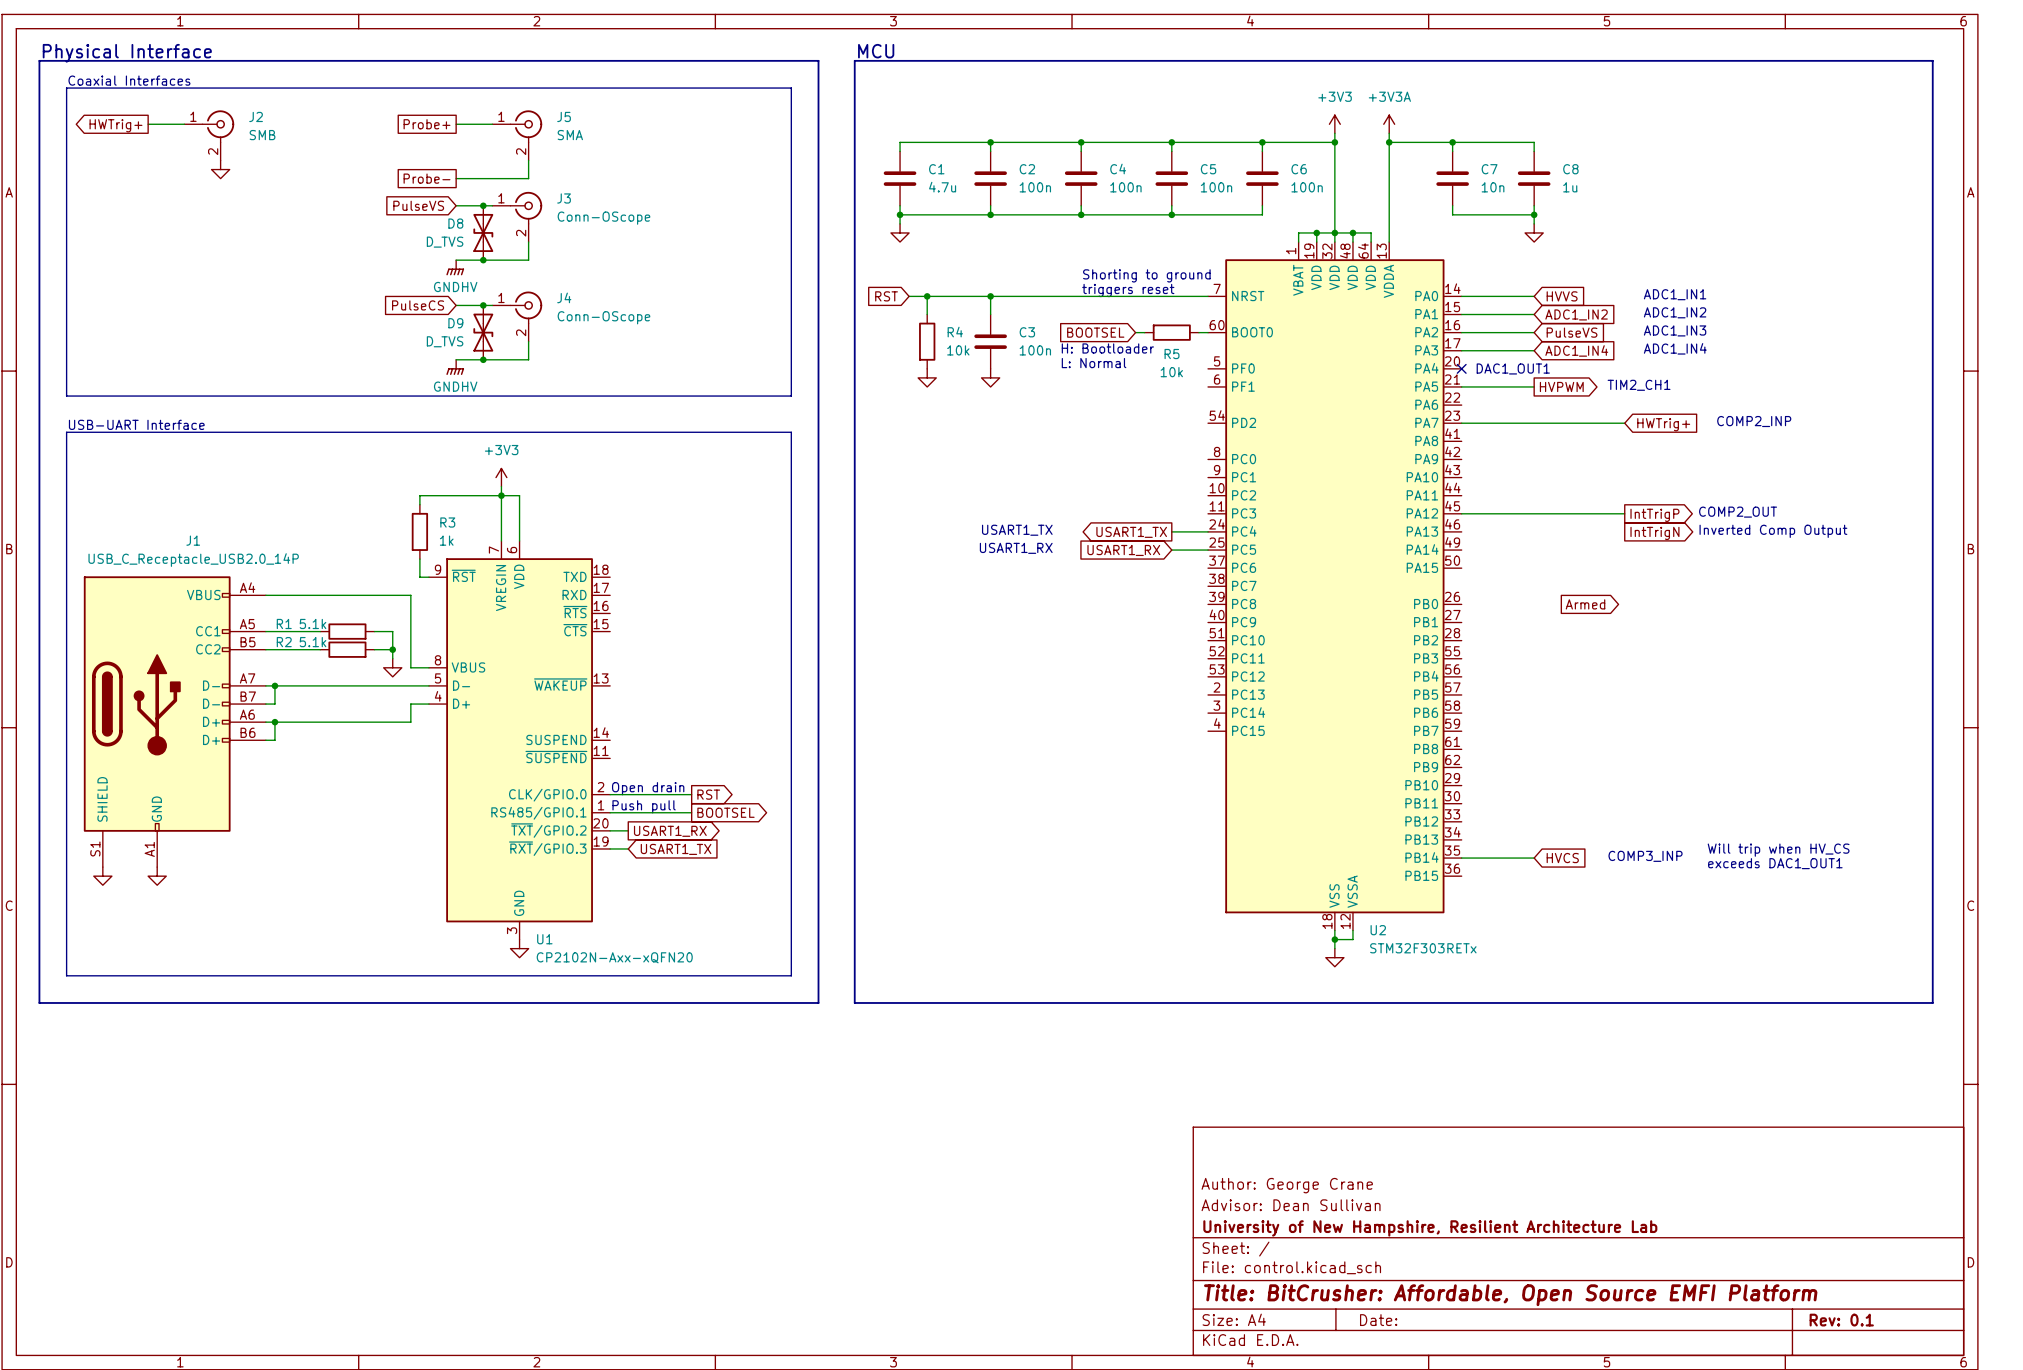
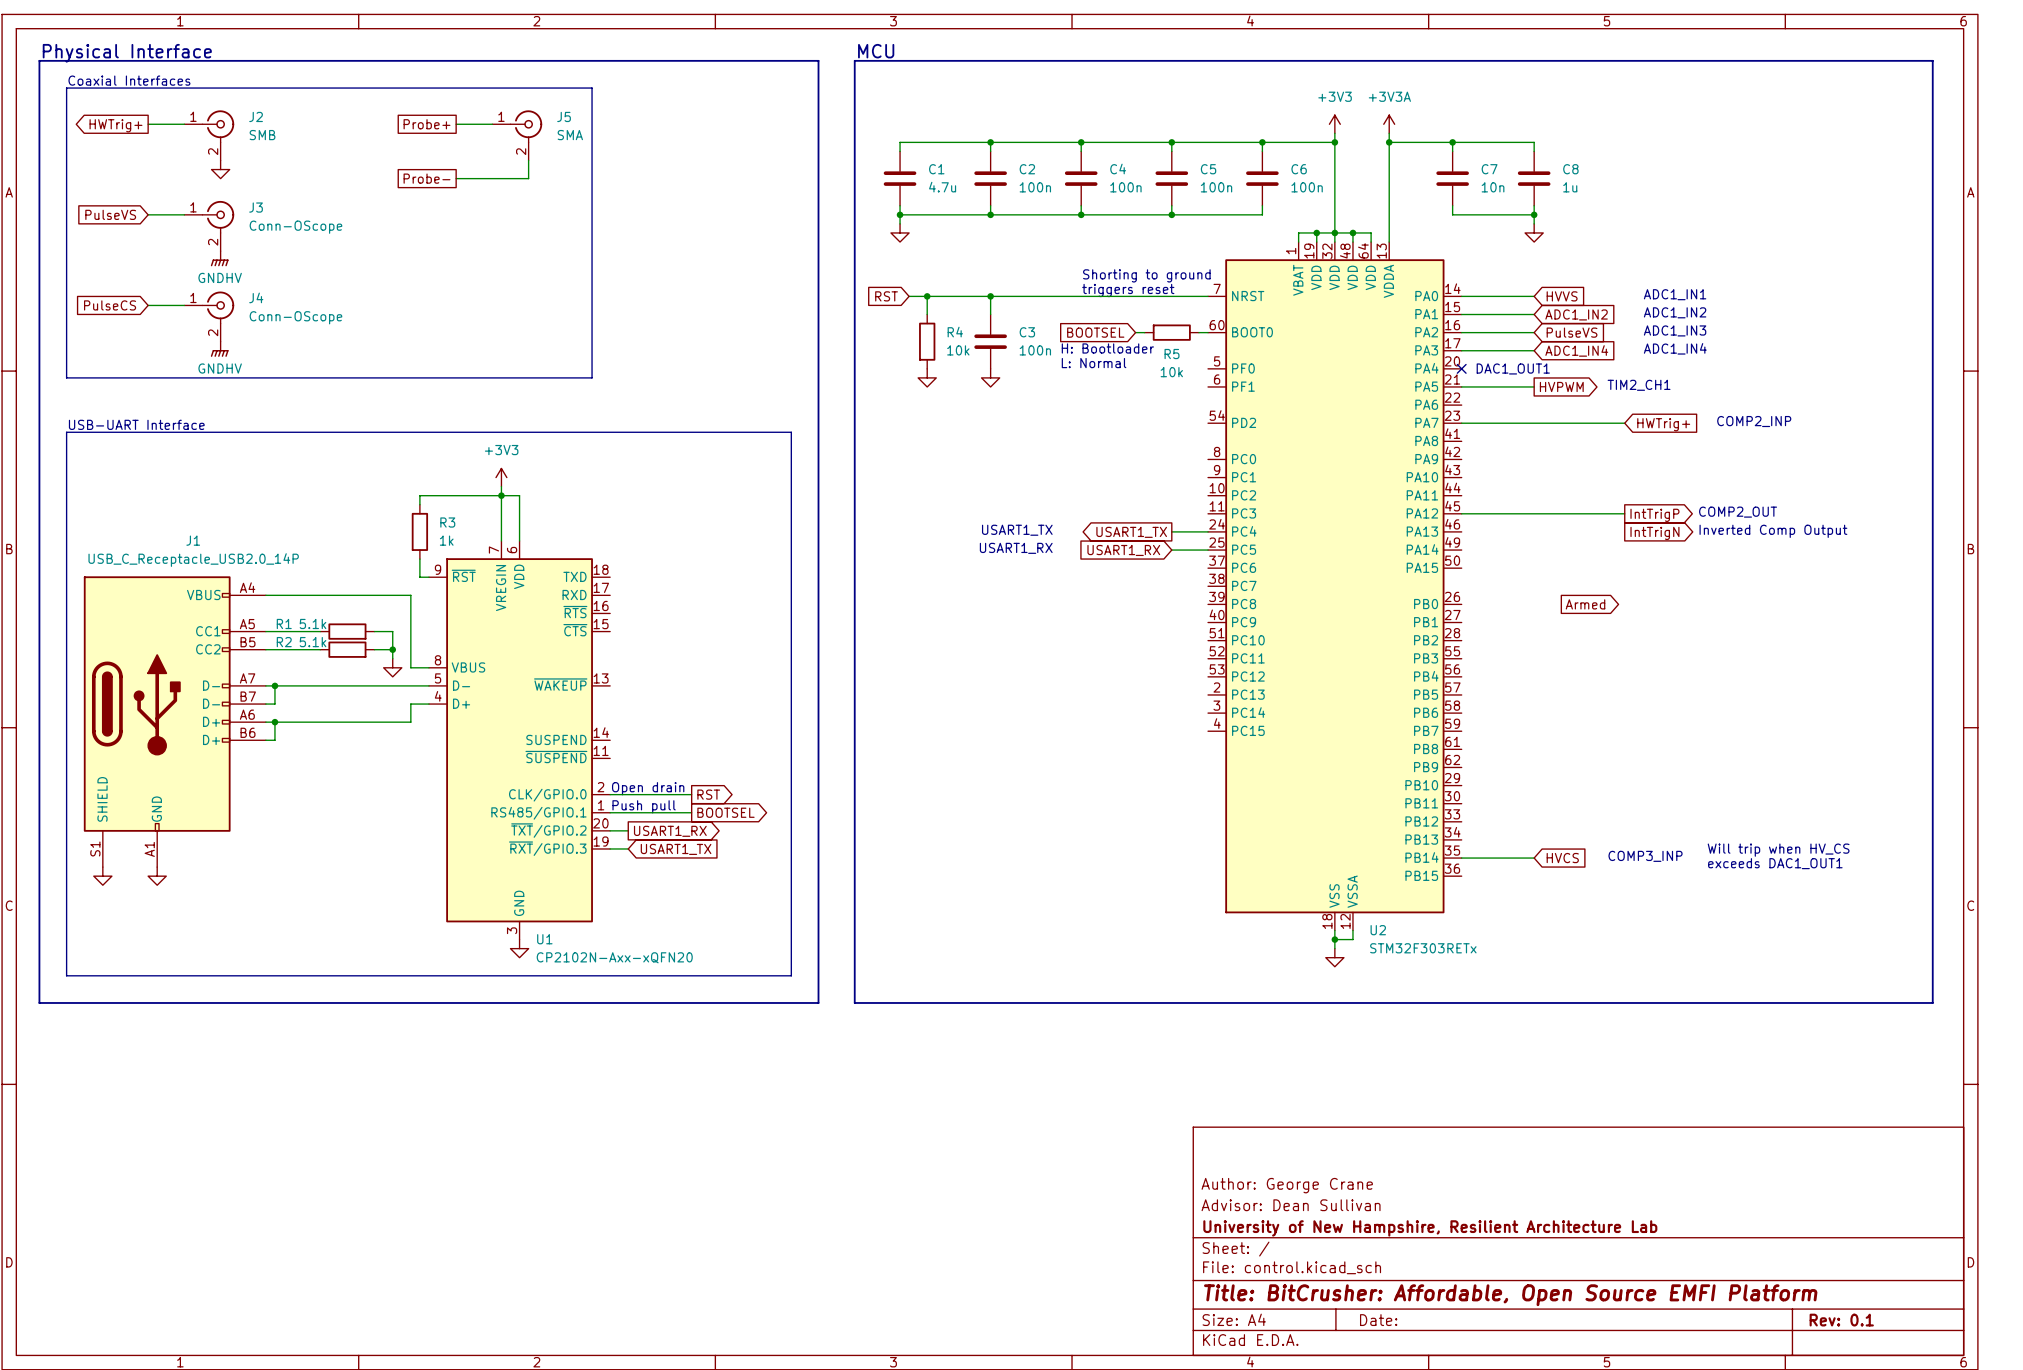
line: (592, 88) (791, 88) (791, 396) (66, 396) (66, 377) -> (592, 88) (592, 377) (66, 377)
global label: PulseVS (418, 205) -> none
wire: (456, 205) (492, 205) -> none
junction: (483, 205) -> none
global label: none -> PulseVS (110, 214)
wire: none -> (148, 214) (184, 214)
J3 position: (517, 216) -> (209, 226)
D8: D_TVS (483, 232) -> none
wire: (528, 242) (528, 260) (456, 260) -> none
power symbol: none -> GNDHV (219, 258)
junction: (483, 260) -> none
power symbol: GNDHV (455, 267) -> none
global label: none -> PulseCS (110, 305)
wire: none -> (148, 305) (184, 305)
global label: PulseCS (418, 305) -> none
wire: (456, 305) (492, 305) -> none
junction: (483, 305) -> none
J4 position: (517, 316) -> (209, 316)
D9: D_TVS (483, 332) -> none
wire: (528, 341) (528, 359) (456, 359) -> none
power symbol: none -> GNDHV (219, 349)
junction: (483, 359) -> none
power symbol: GNDHV (455, 367) -> none

